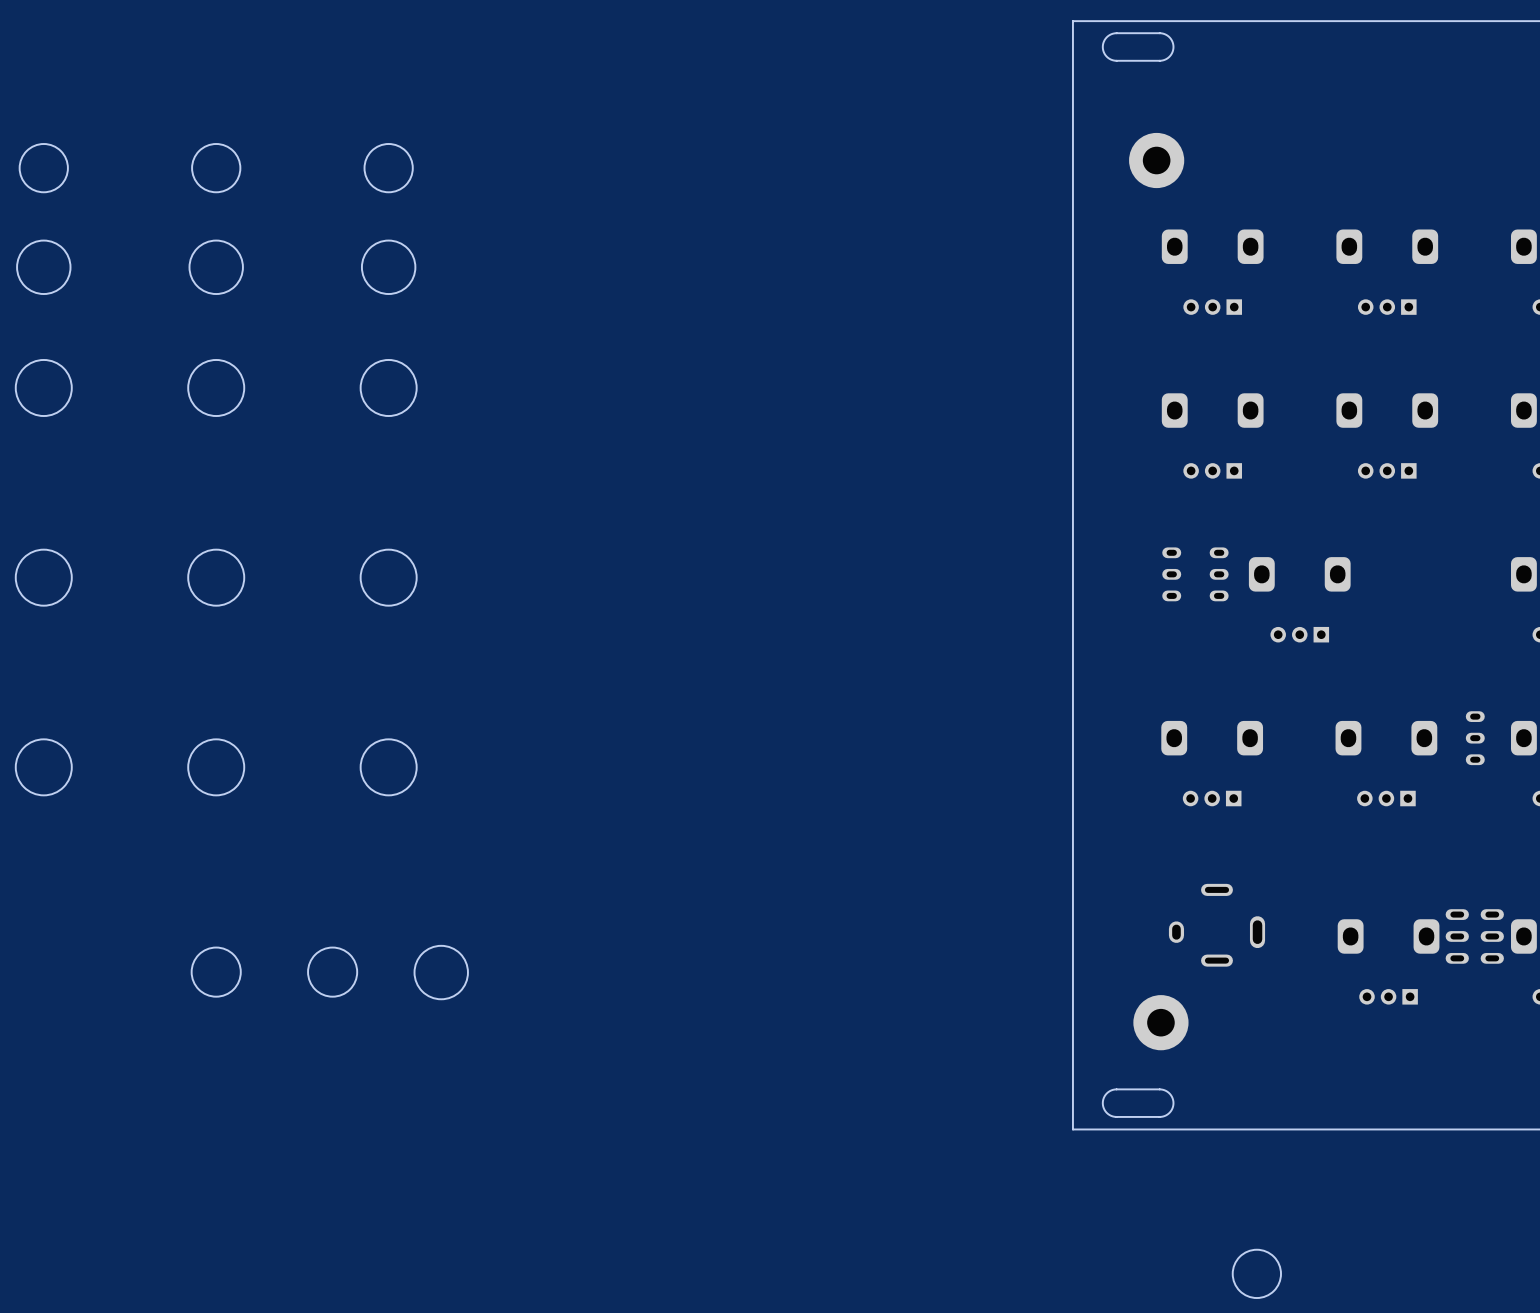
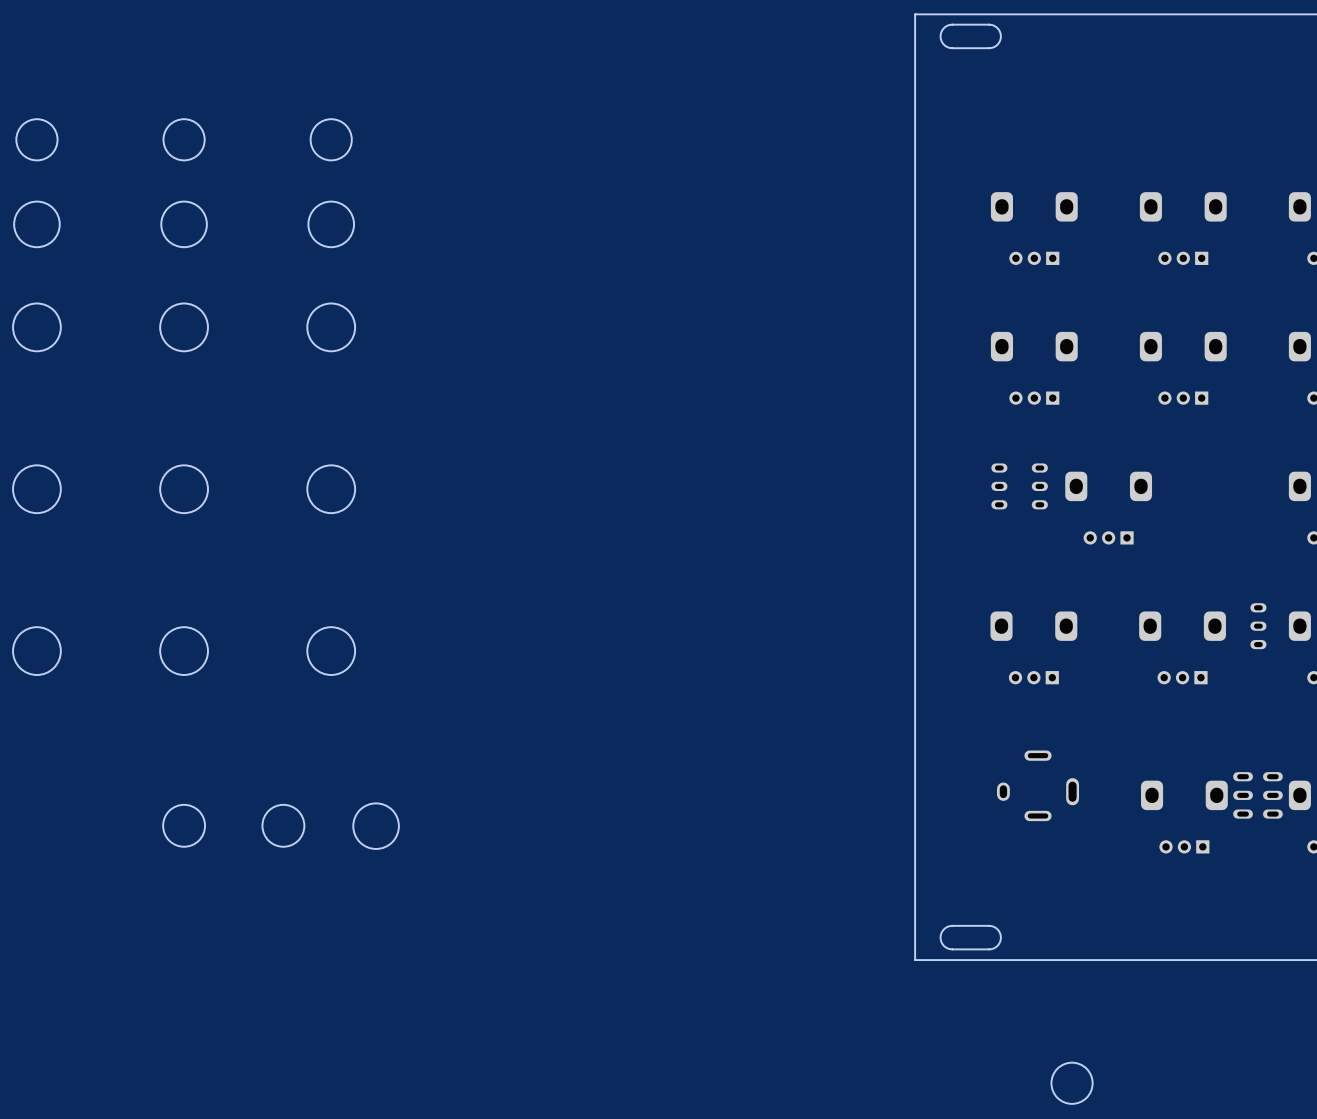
part: (1156, 160) -> none
part: (1160, 1022) -> none

